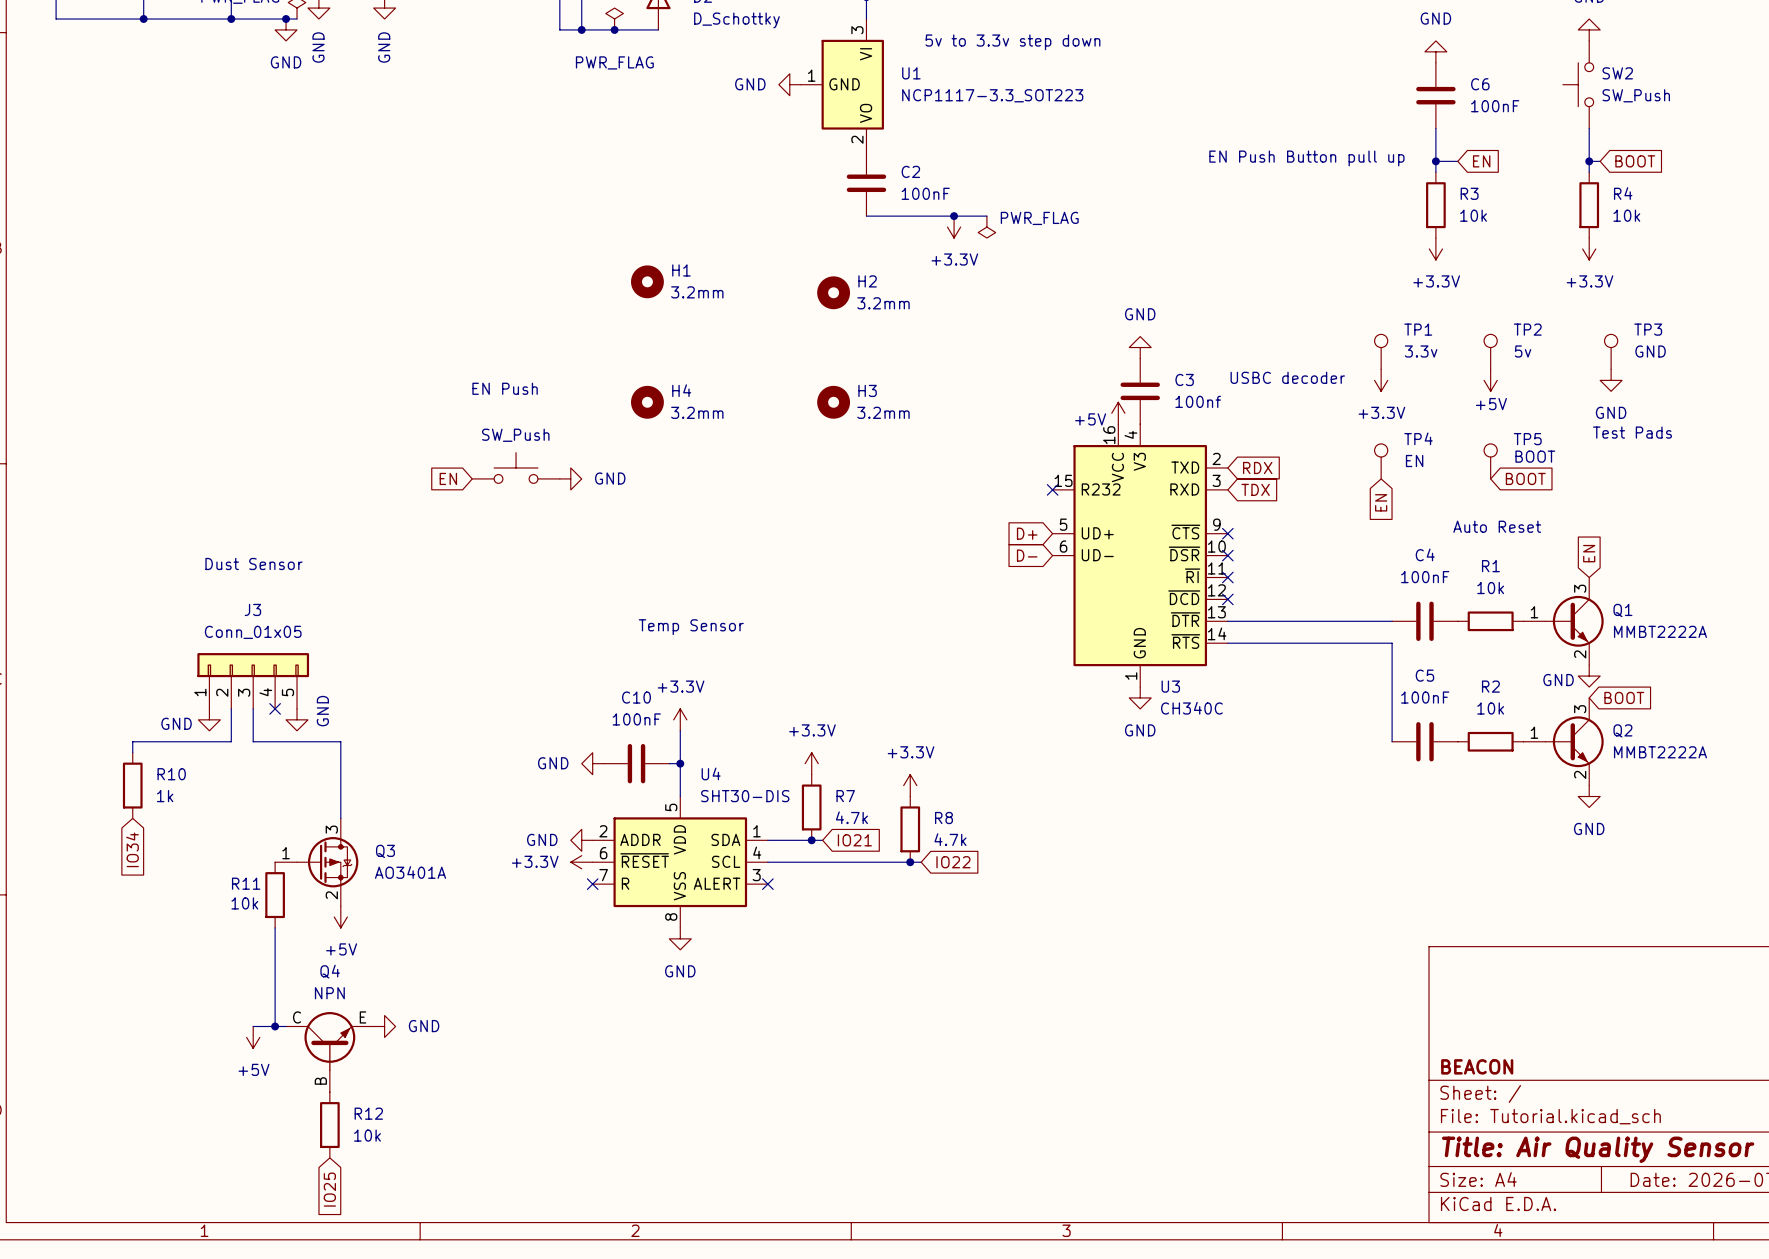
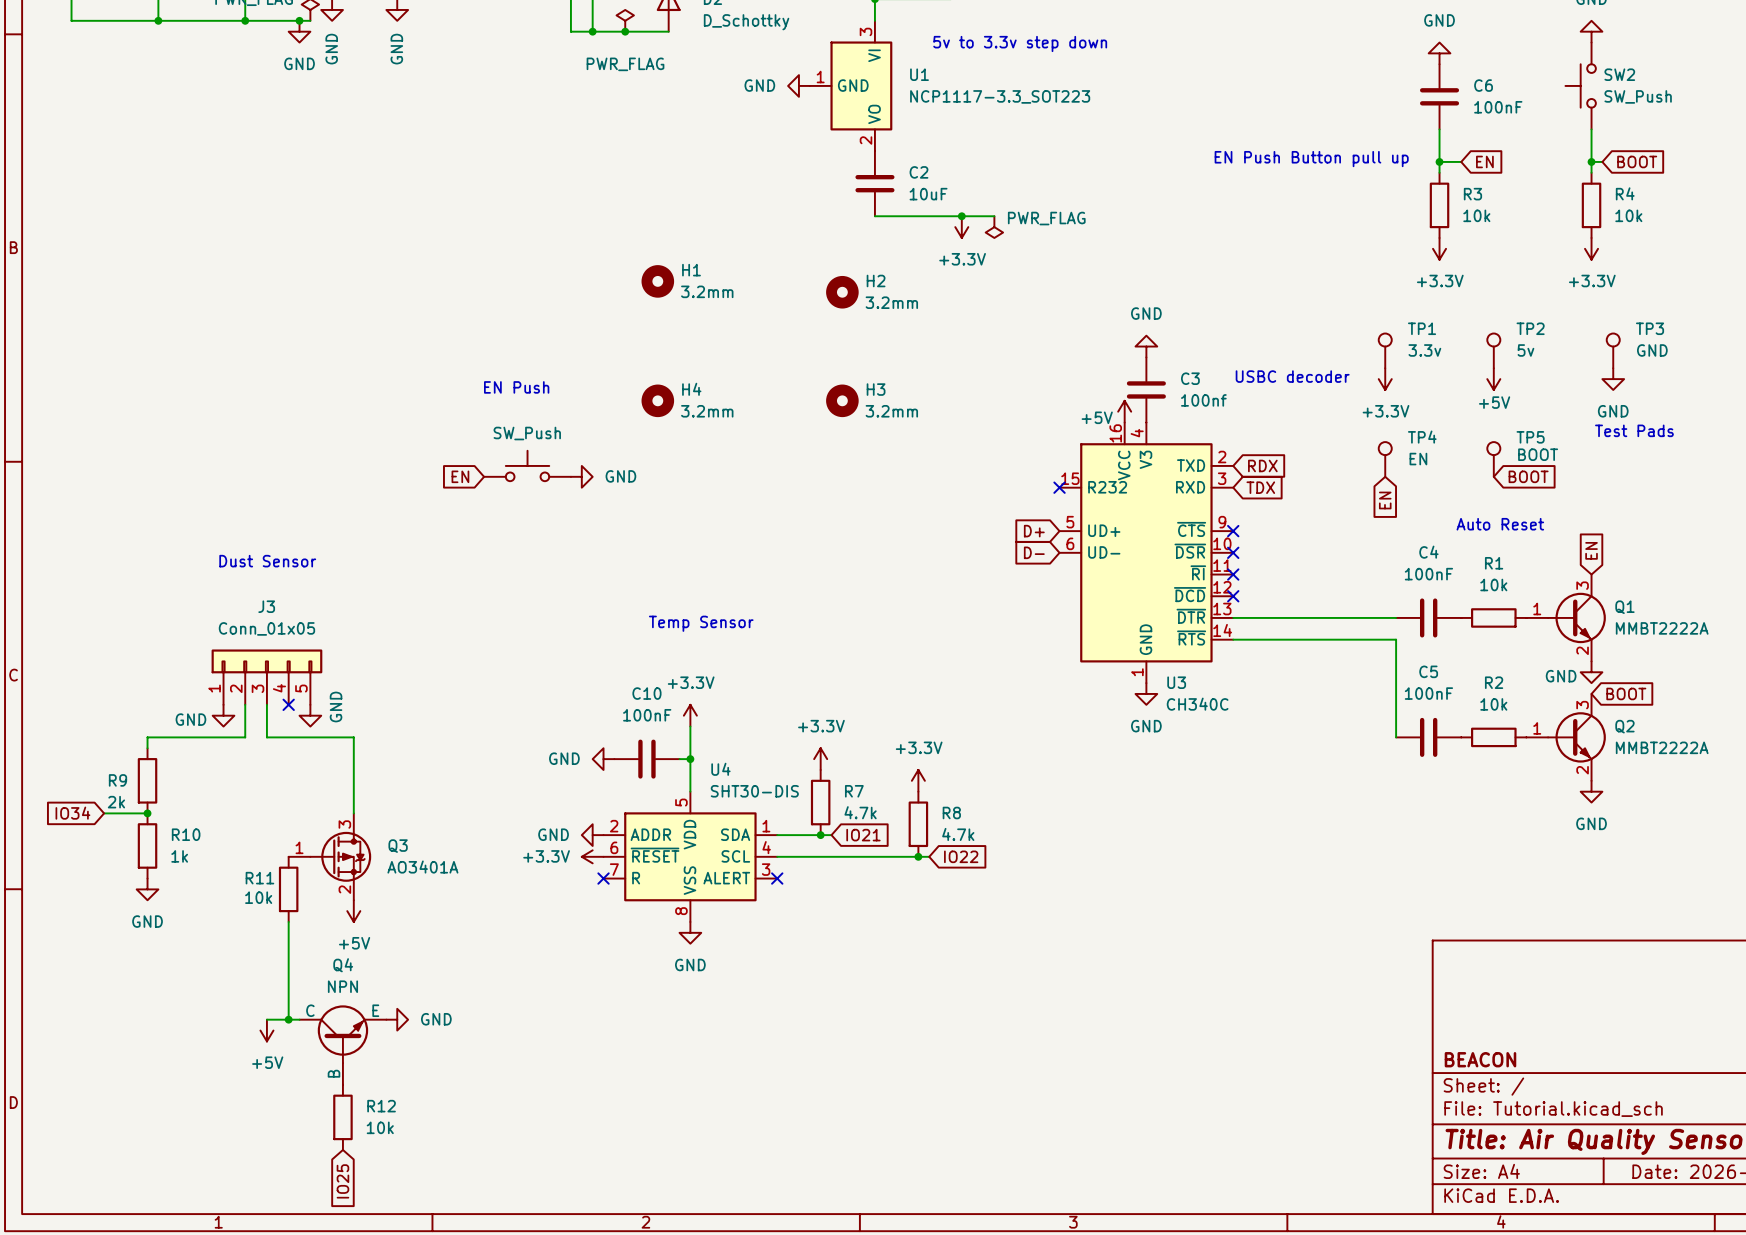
C2 value: 100nF (925, 193) -> 10uF (928, 194)
R10 name: R10 (171, 774) -> R9 (117, 780)
R10 value: 1k (165, 796) -> 2k (116, 802)
wire: none -> (104, 813) (147, 813)
junction: none -> (147, 813)
global label rotation: 0° (132, 849) -> 90° clockwise (72, 813)
global label position: IO34 (132, 849) -> IO34 (72, 813)
R10: none -> 1k (147, 845)
power symbol: none -> GND (147, 889)

